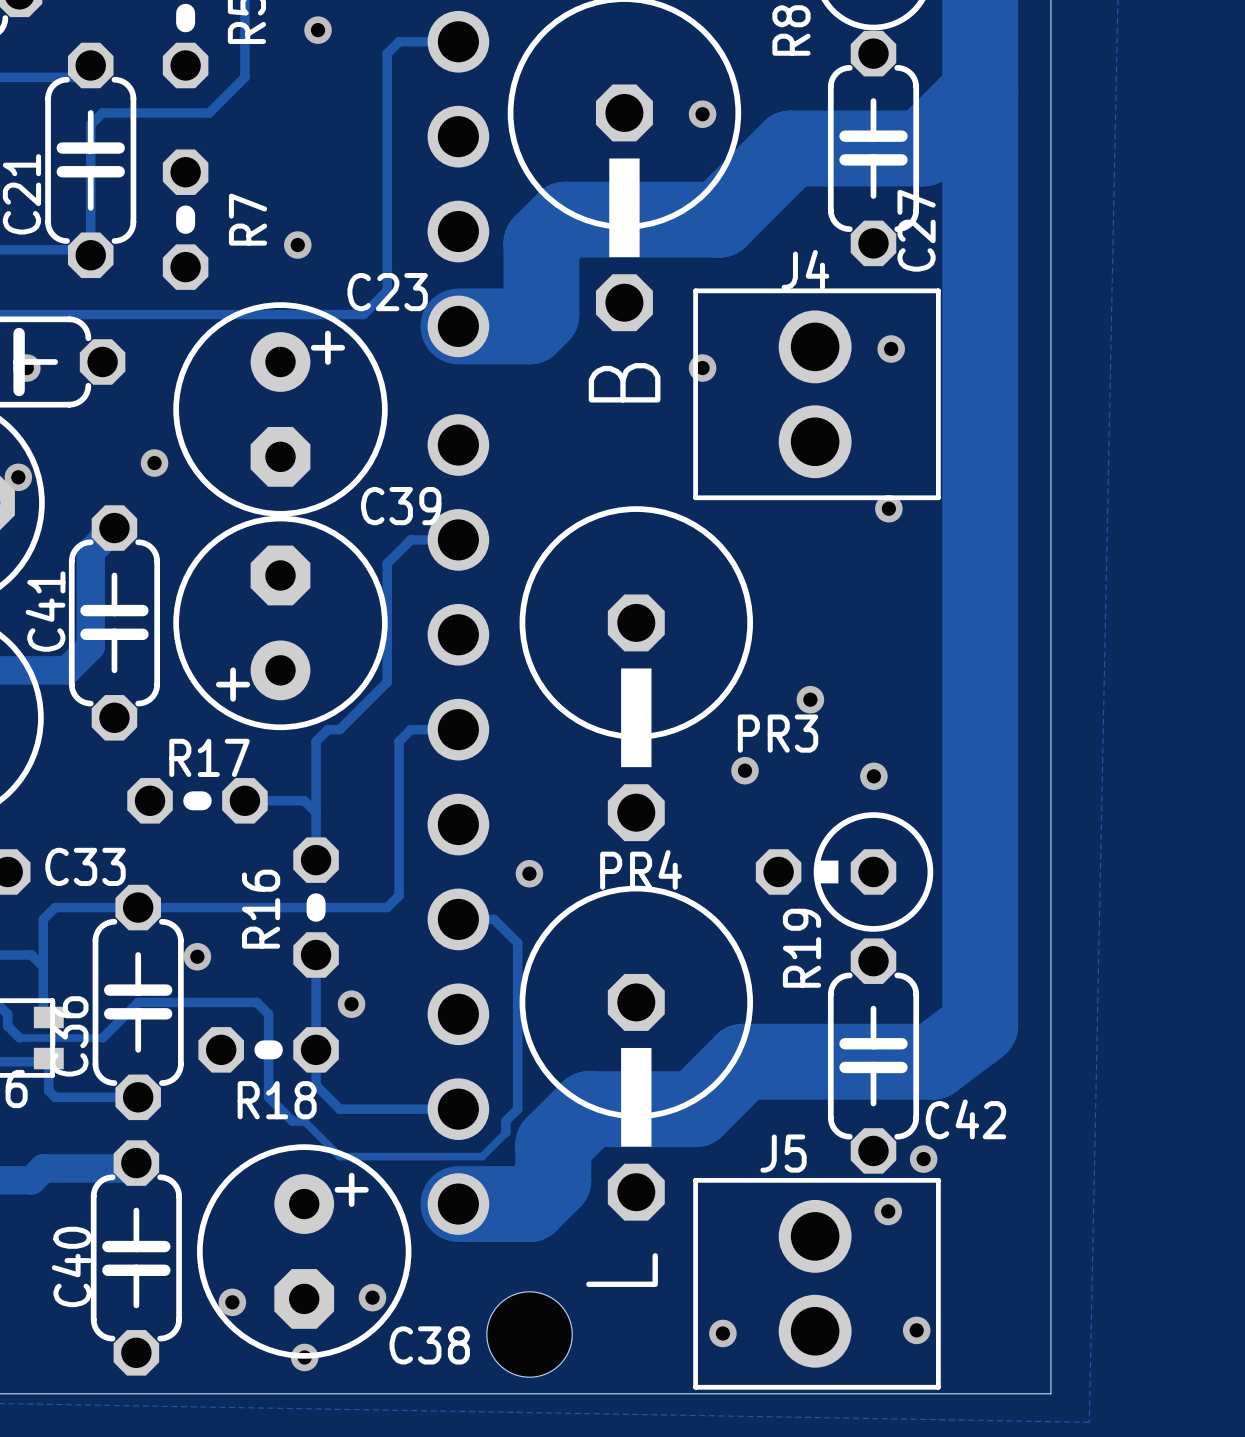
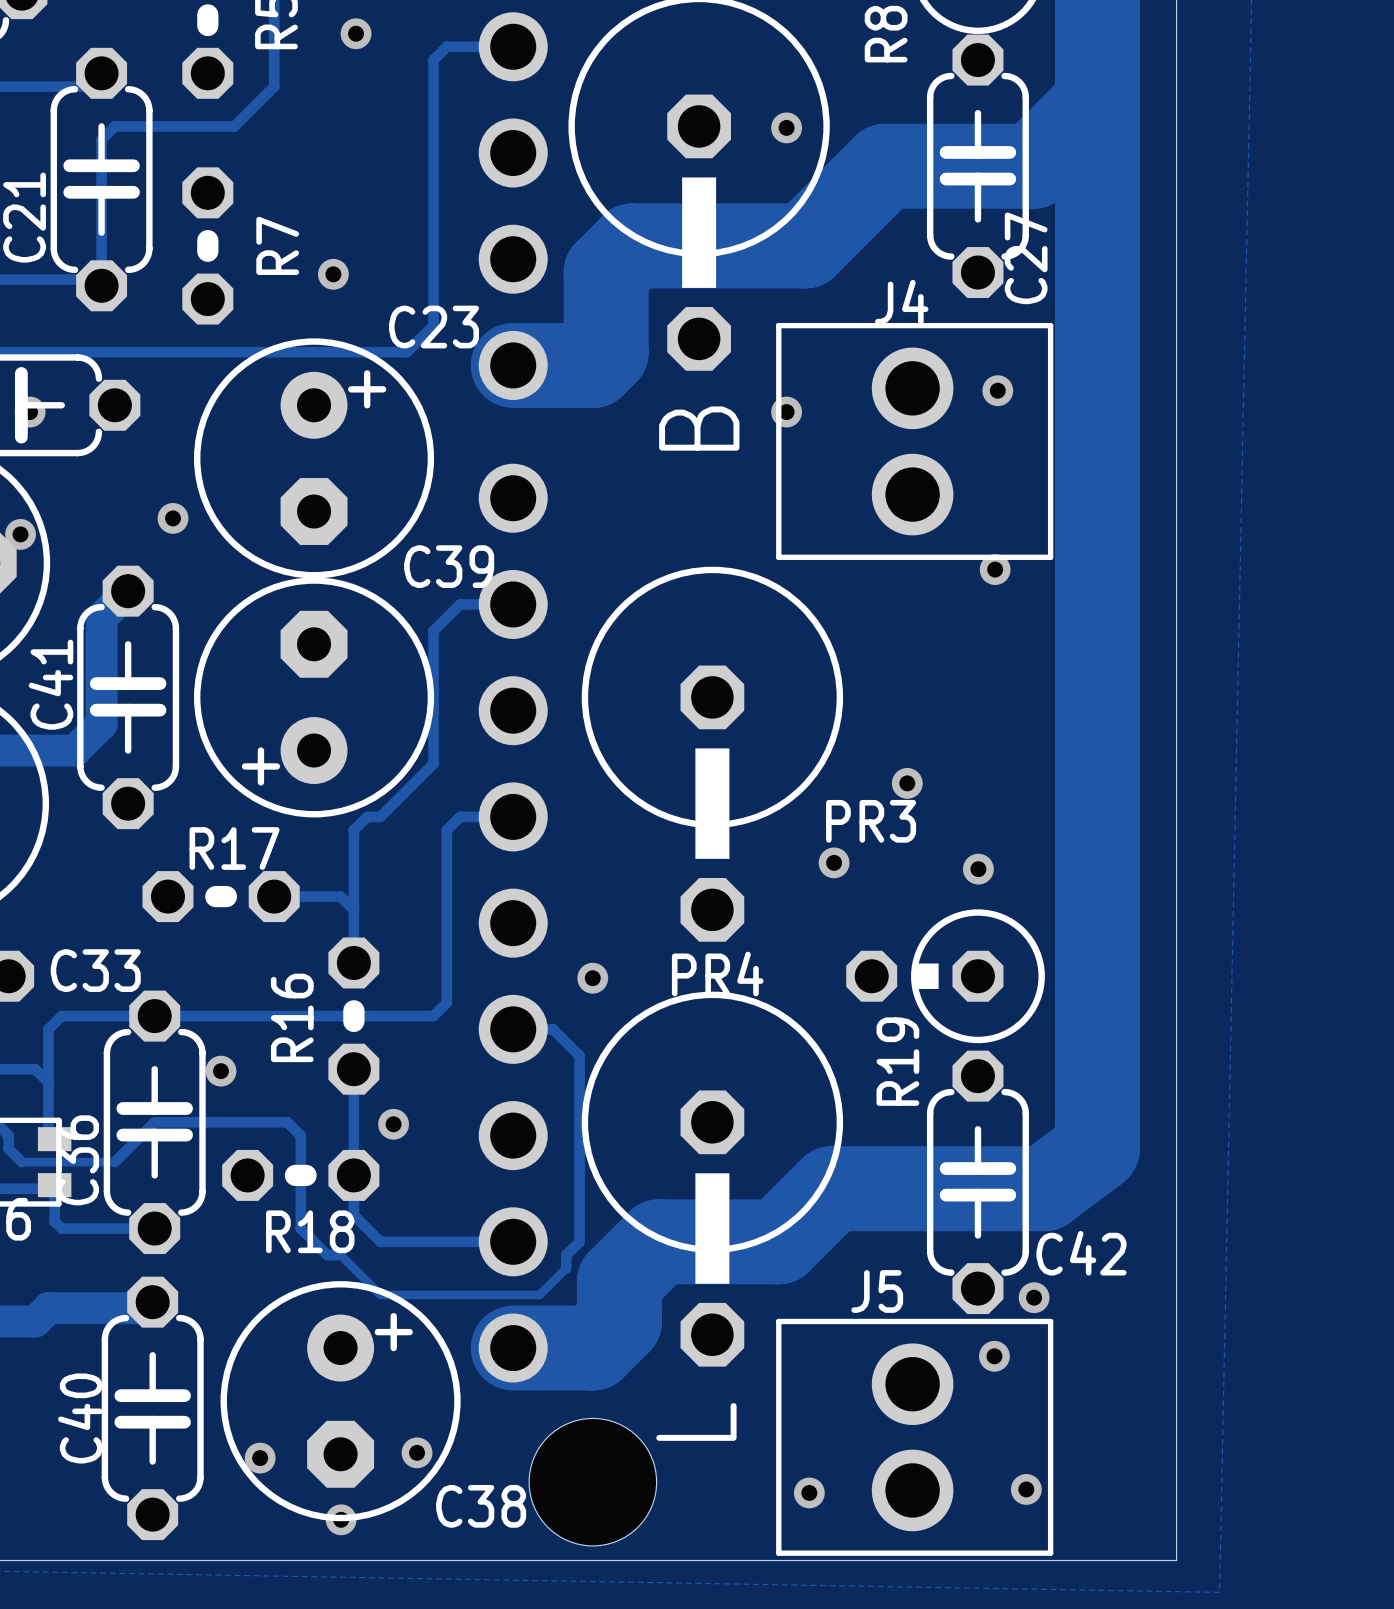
hole size: [486, 1291, 573, 1378] -> [529, 1418, 657, 1546]

